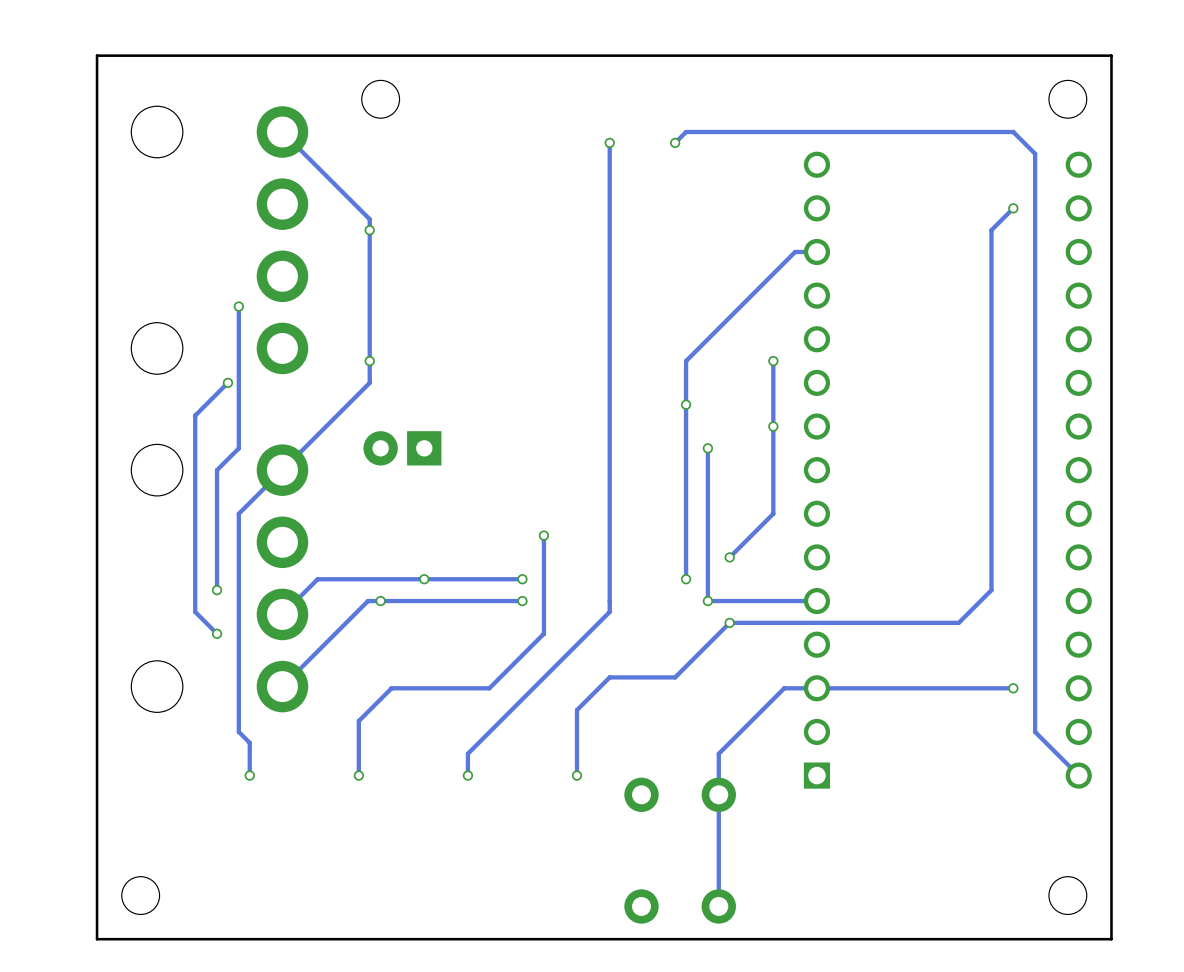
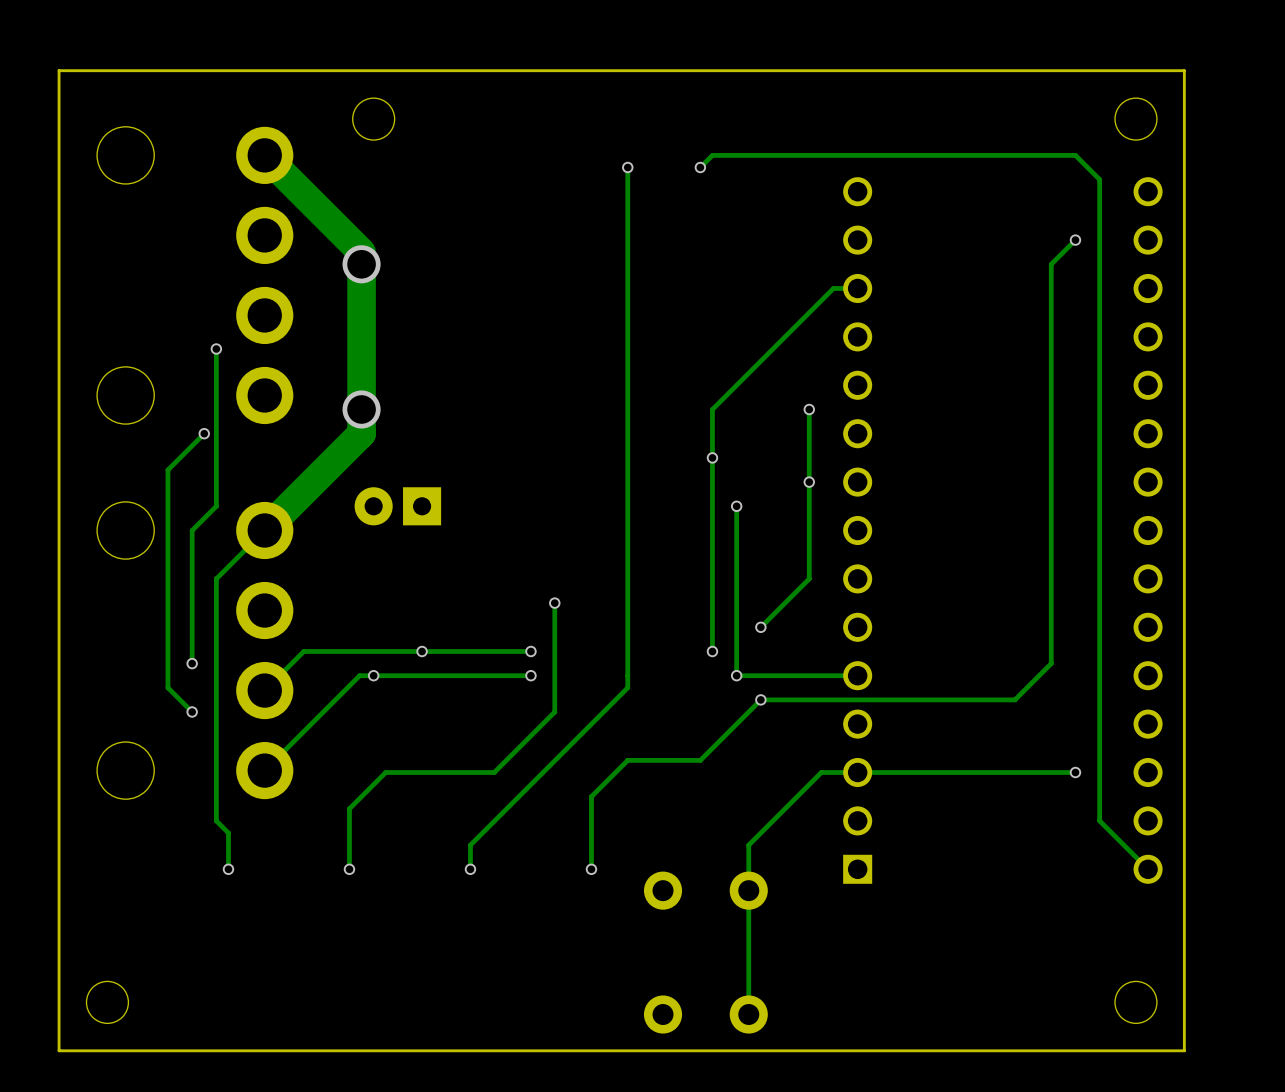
track width: thin (282, 132) (369, 219) -> thick (264, 155) (361, 252)
via size: [364, 225, 375, 236] -> [342, 245, 381, 284]
track width: thin (369, 230) (369, 382) (282, 470) -> thick (361, 264) (361, 433) (264, 530)
via size: [364, 355, 375, 367] -> [342, 390, 381, 429]

